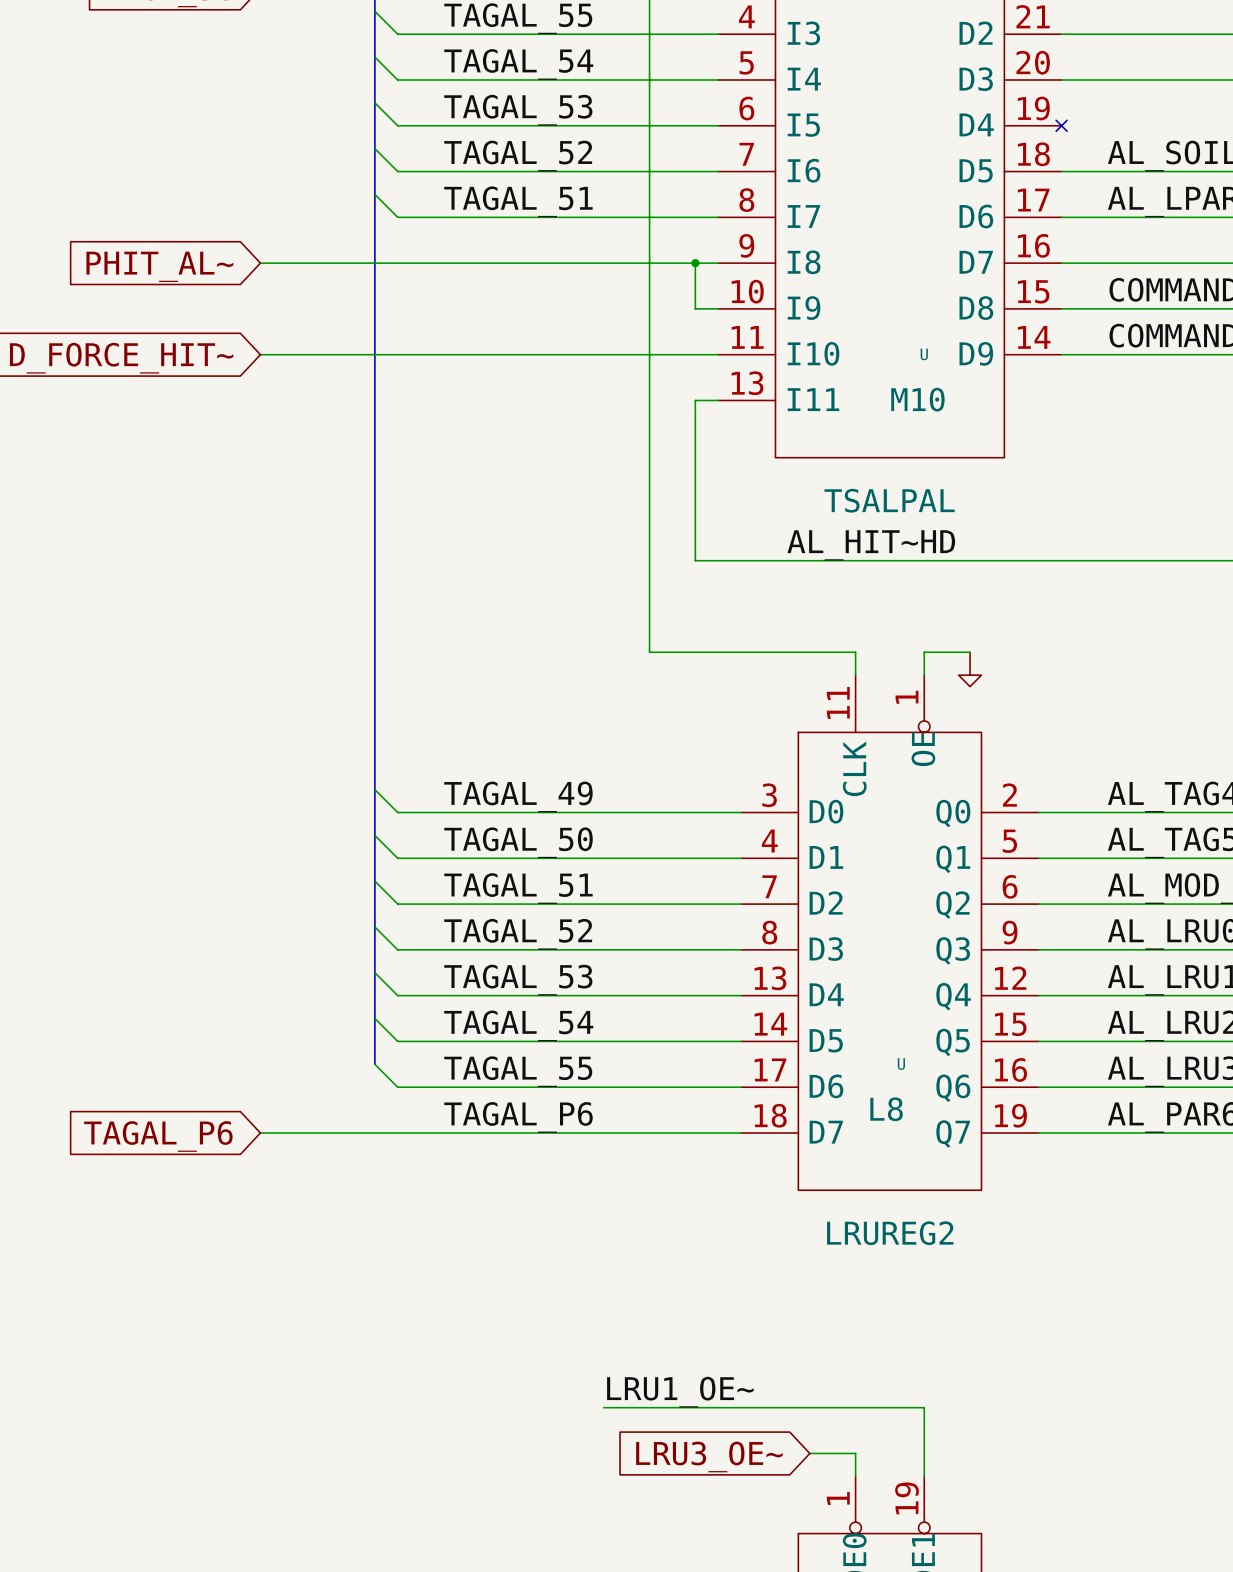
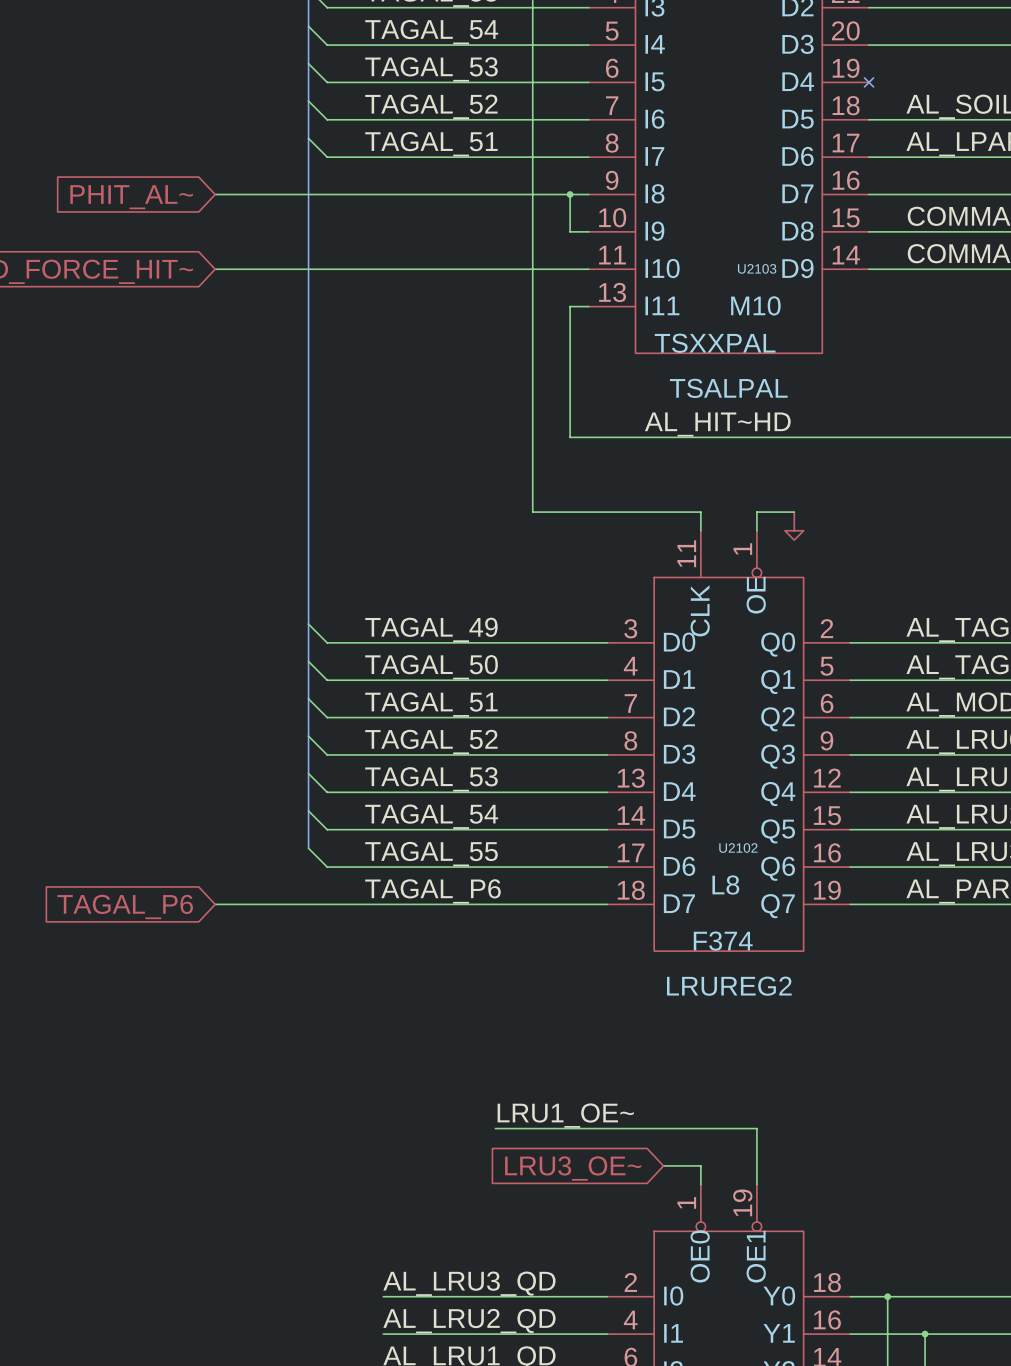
U name: U (924, 354) -> U2103 (757, 268)
U value: none -> TSXXPAL (715, 343)
U name: U (901, 1064) -> U2102 (738, 848)
U value: none -> F374 (723, 941)

